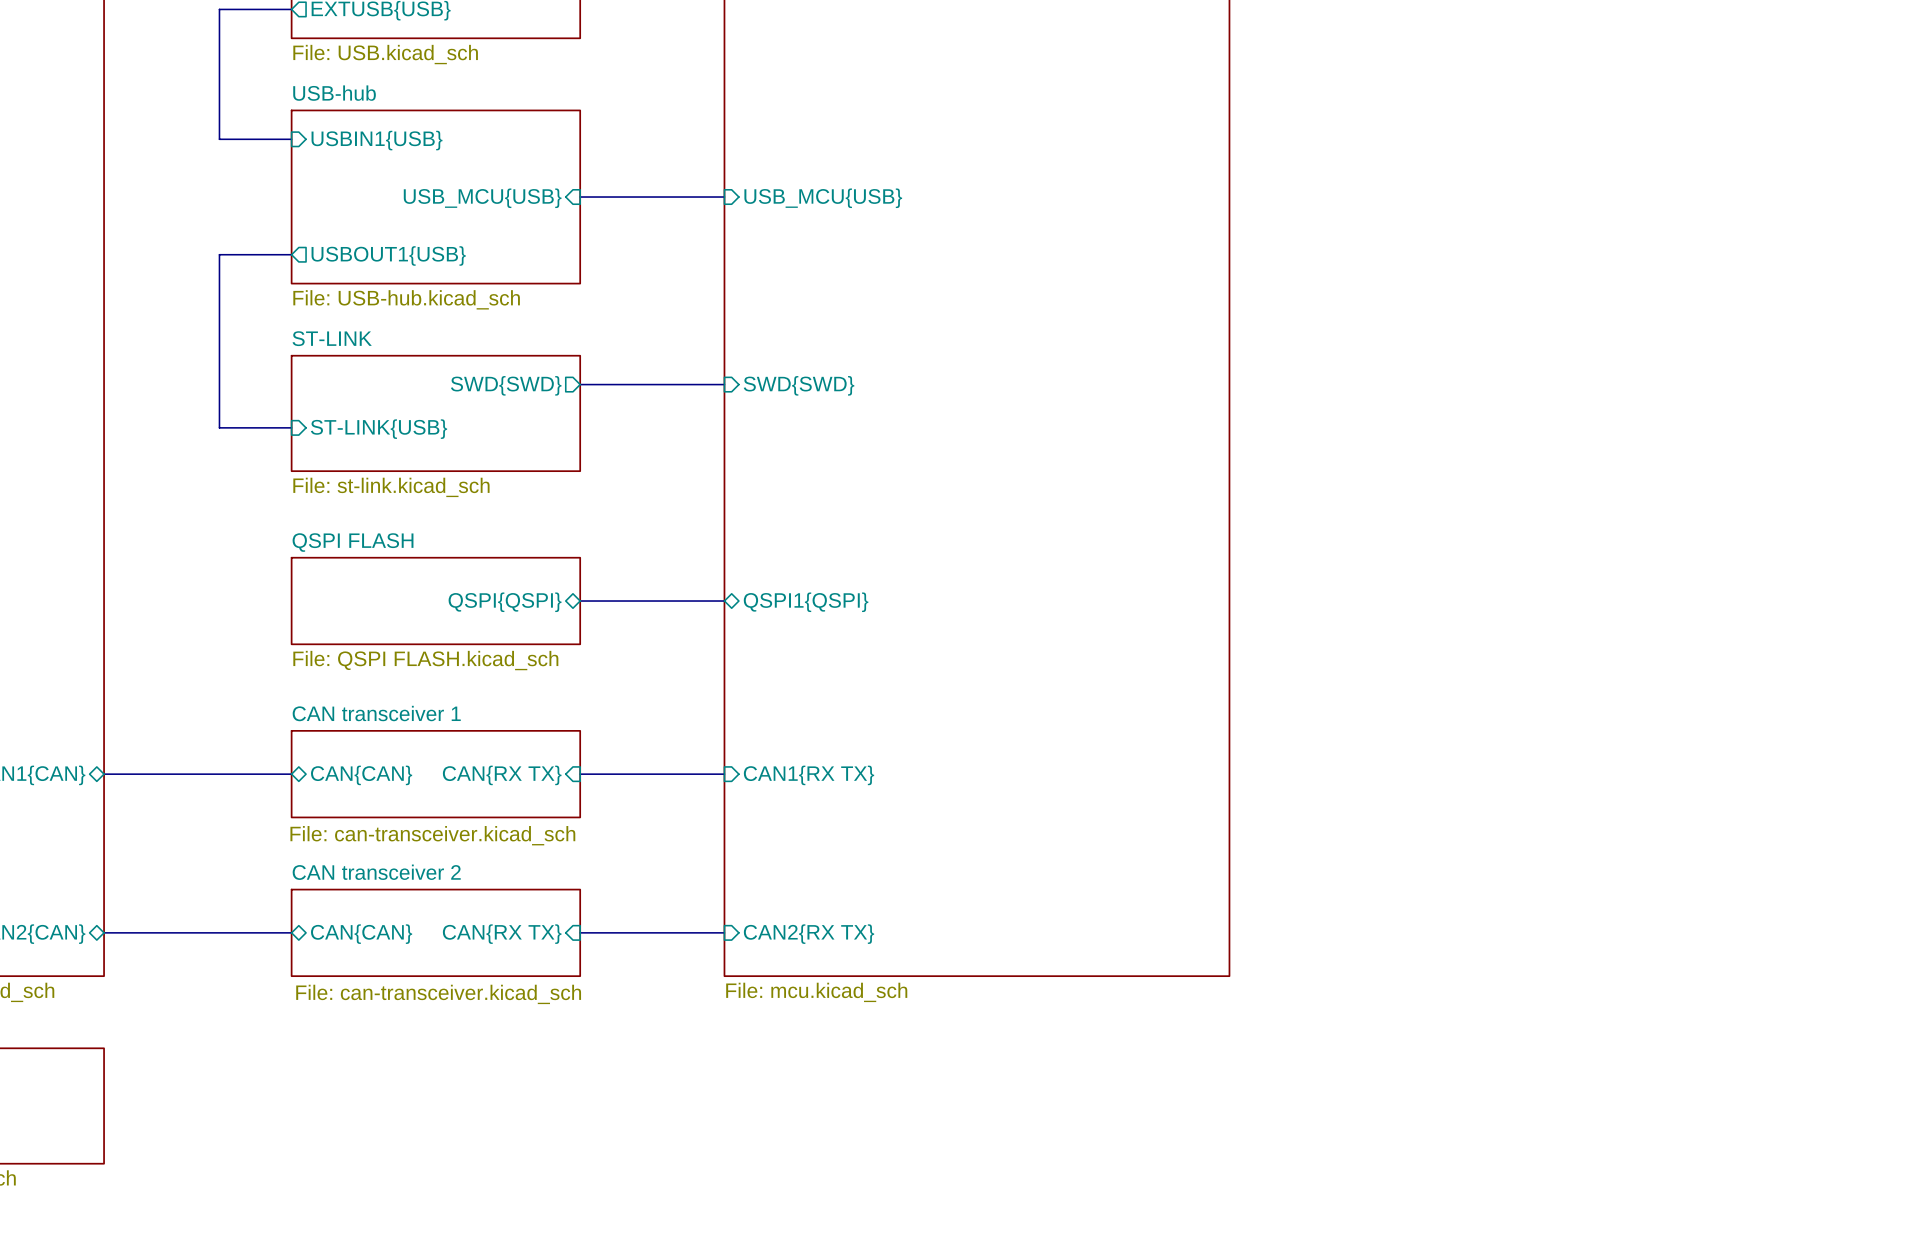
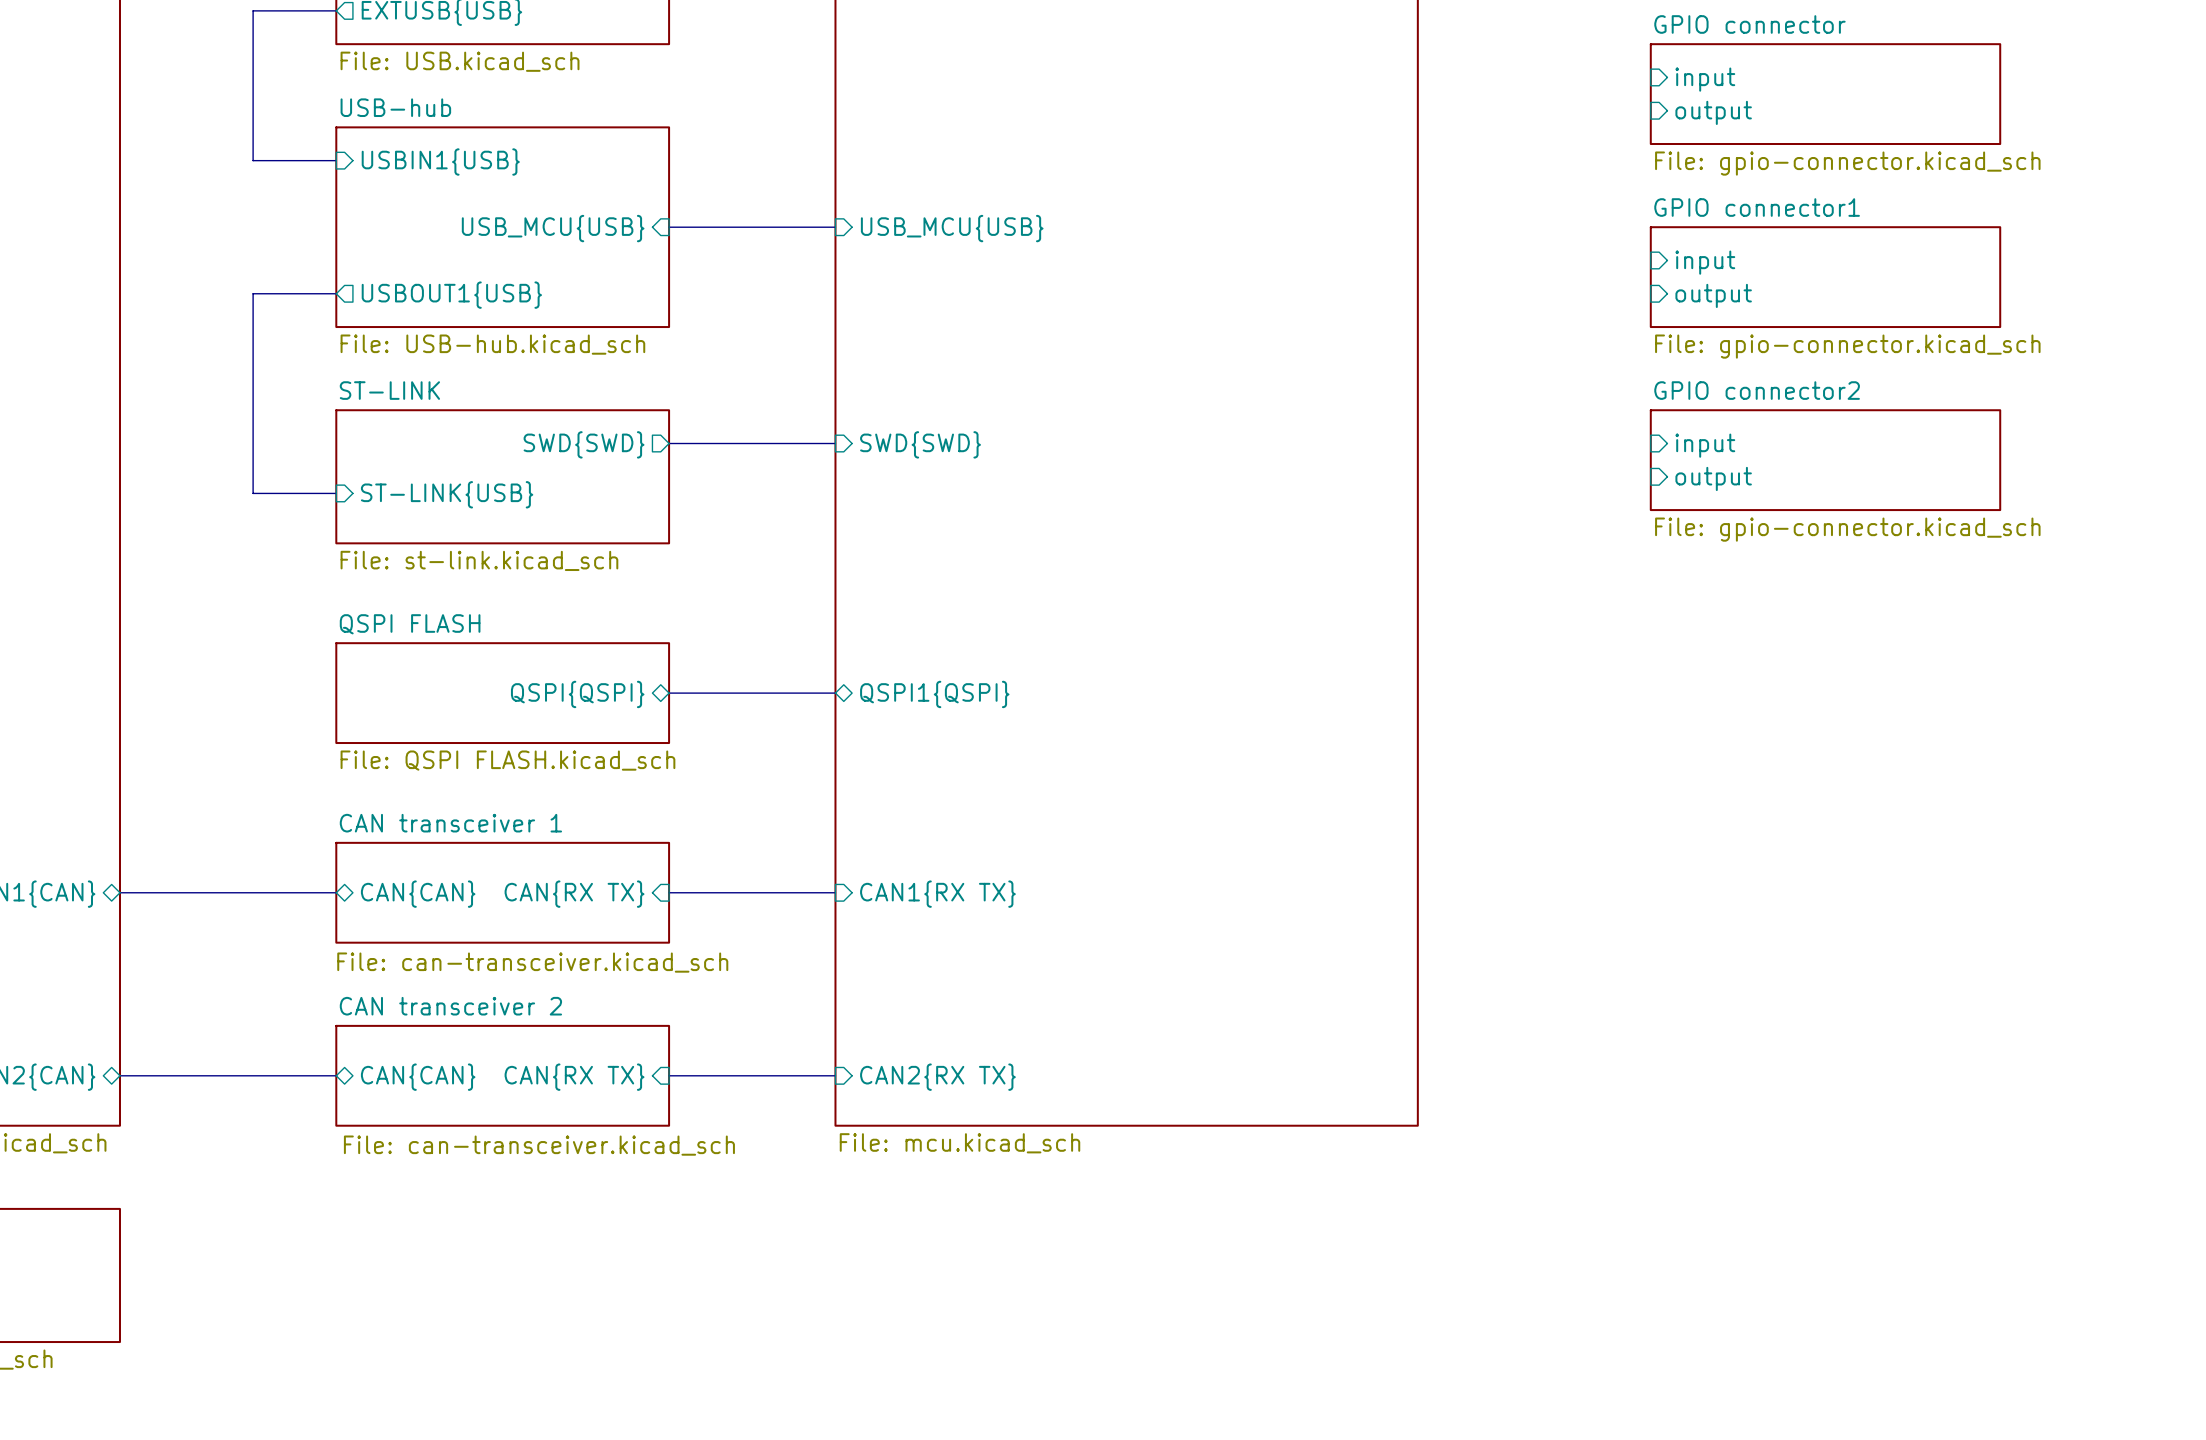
sheet pin: none -> input (1705, 79)
sheet GPIO connector: none -> File: gpio-connector.kicad_sch (1825, 94)
sheet pin: none -> output (1713, 112)
sheet pin: none -> input (1705, 262)
sheet GPIO connector1: none -> File: gpio-connector.kicad_sch (1825, 277)
sheet pin: none -> output (1713, 295)
sheet pin: none -> input (1705, 445)
sheet GPIO connector2: none -> File: gpio-connector.kicad_sch (1825, 460)
sheet pin: none -> output (1713, 478)

